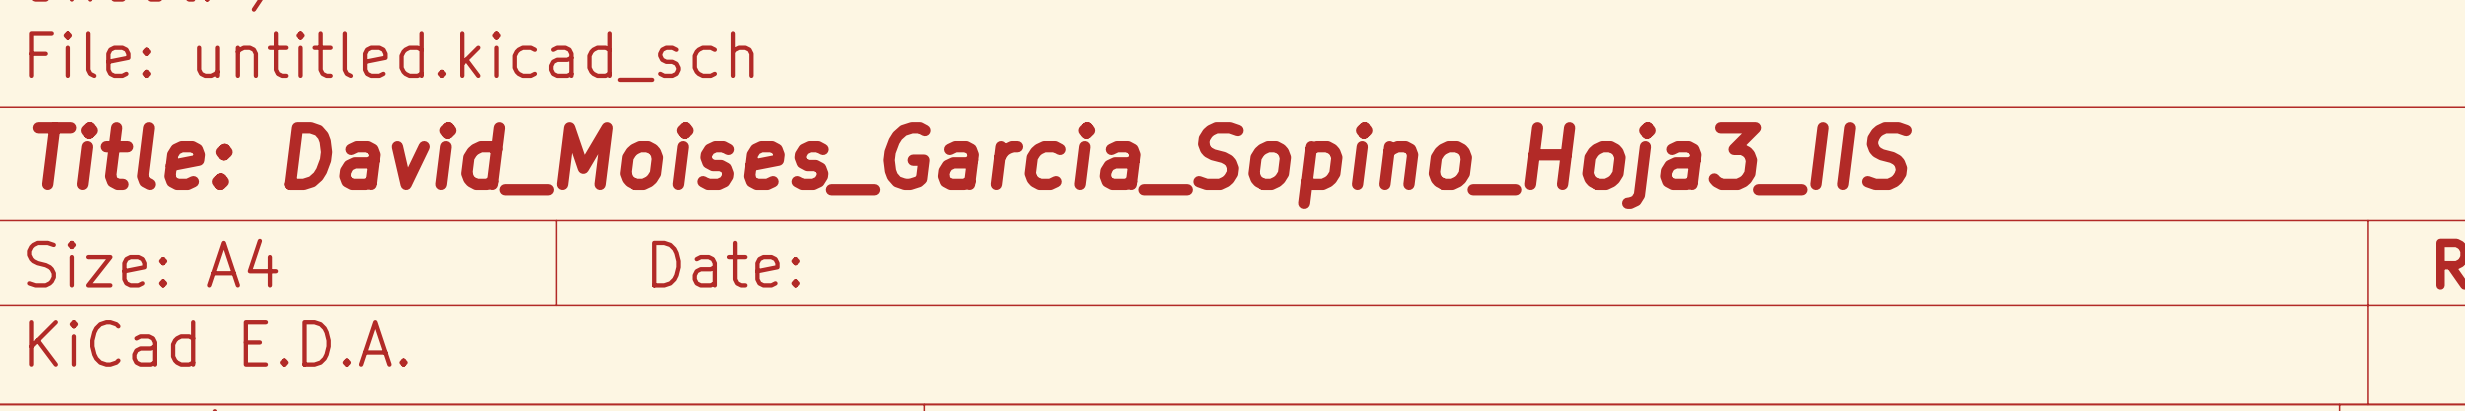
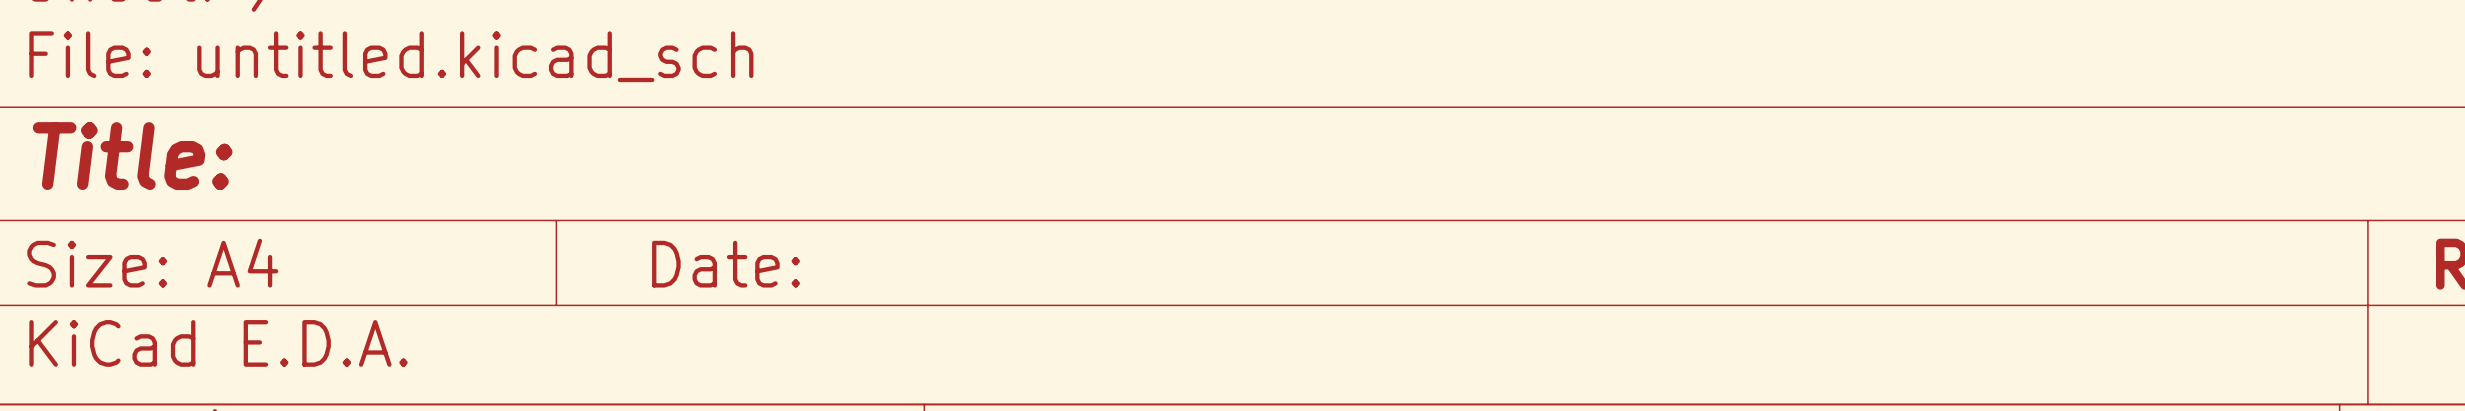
title block: Title: David_Moises_Garcia_Sopino_Hoja3_IIS (972, 165) -> Title: (132, 156)

